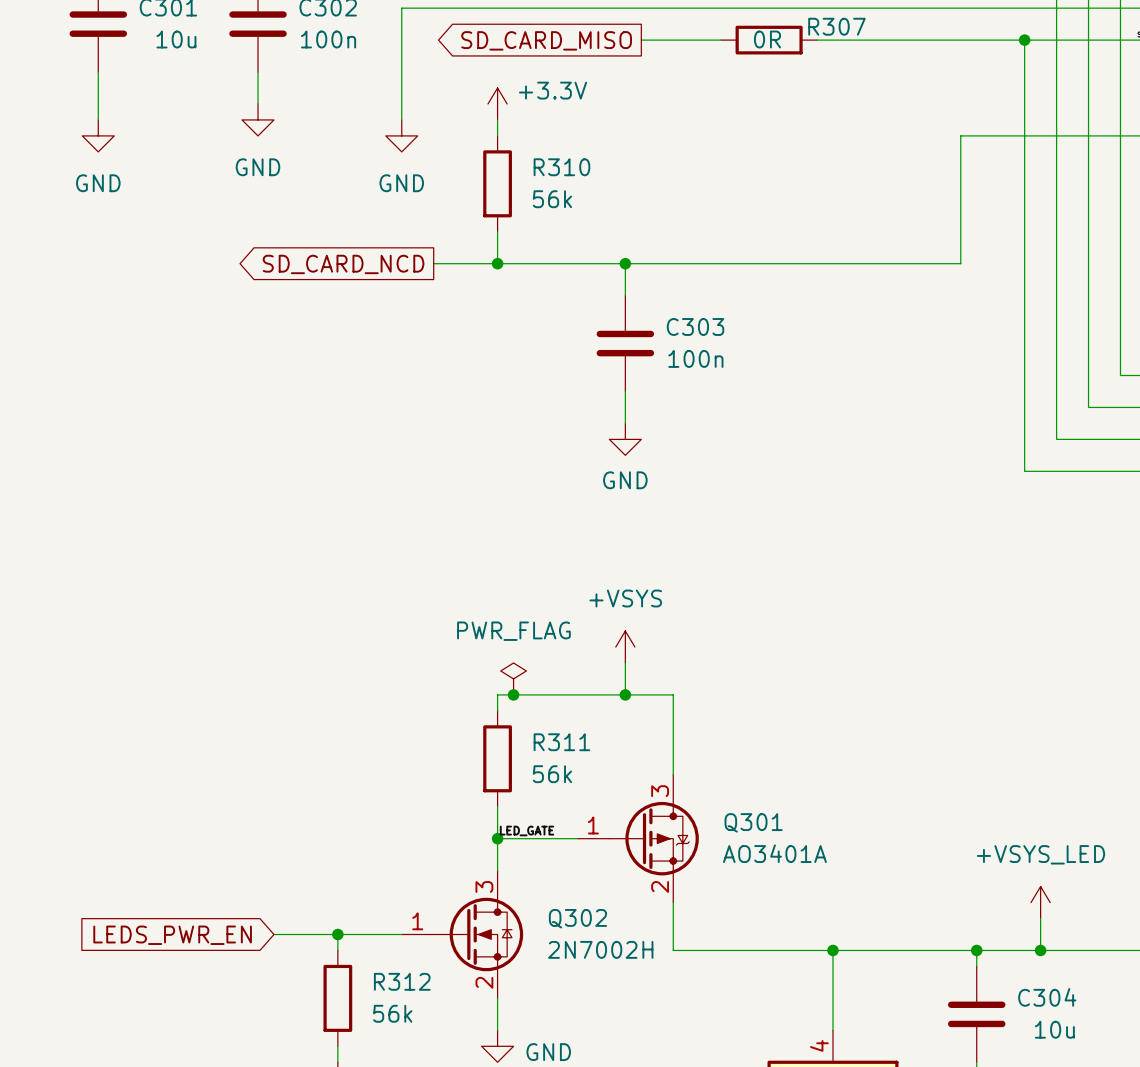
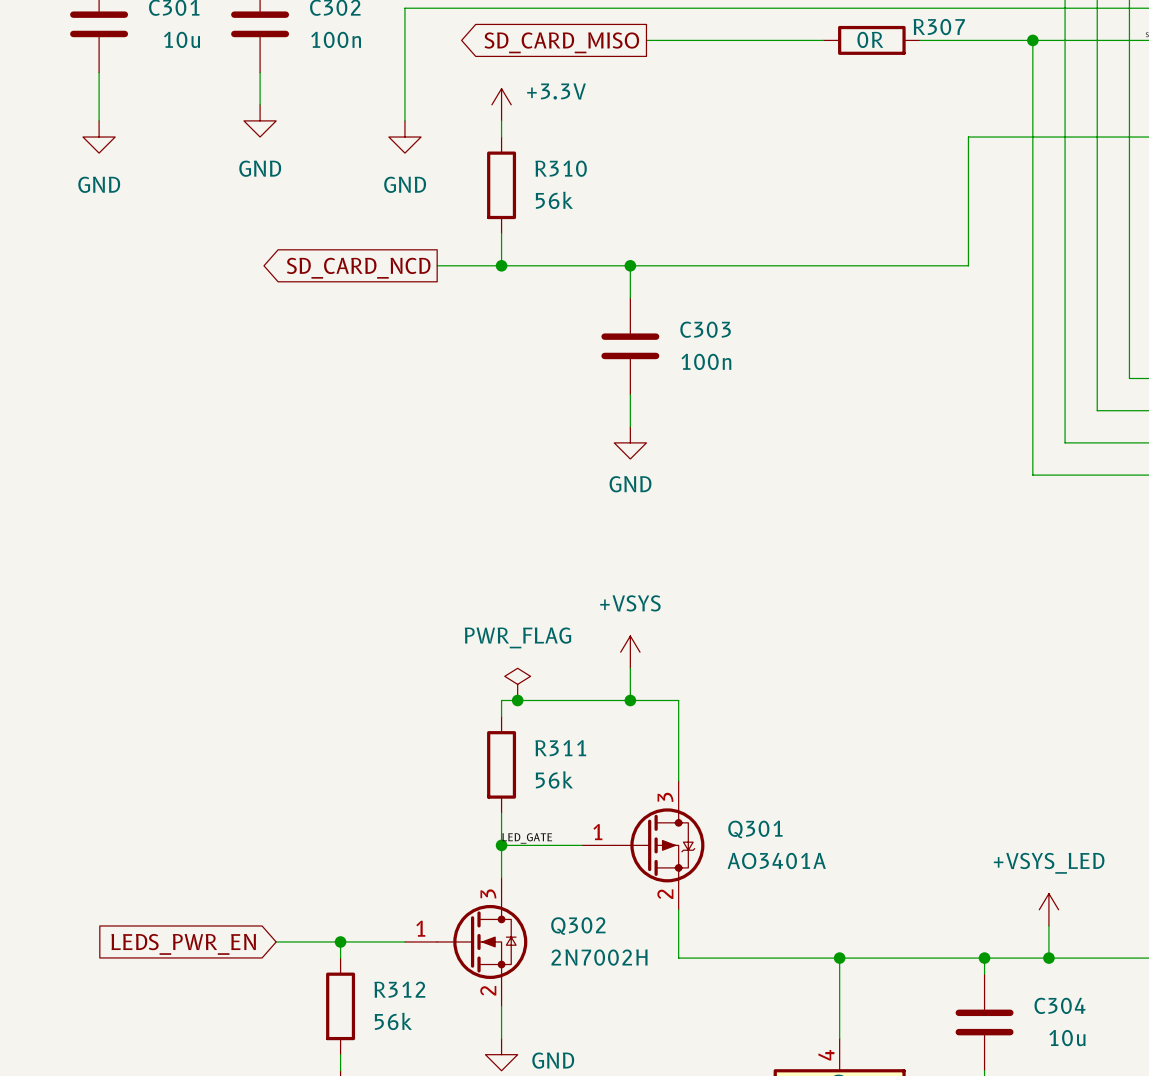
R307 position: (769, 40) -> (871, 40)
wire: (817, 40) (912, 40) -> (823, 40) (726, 40)

